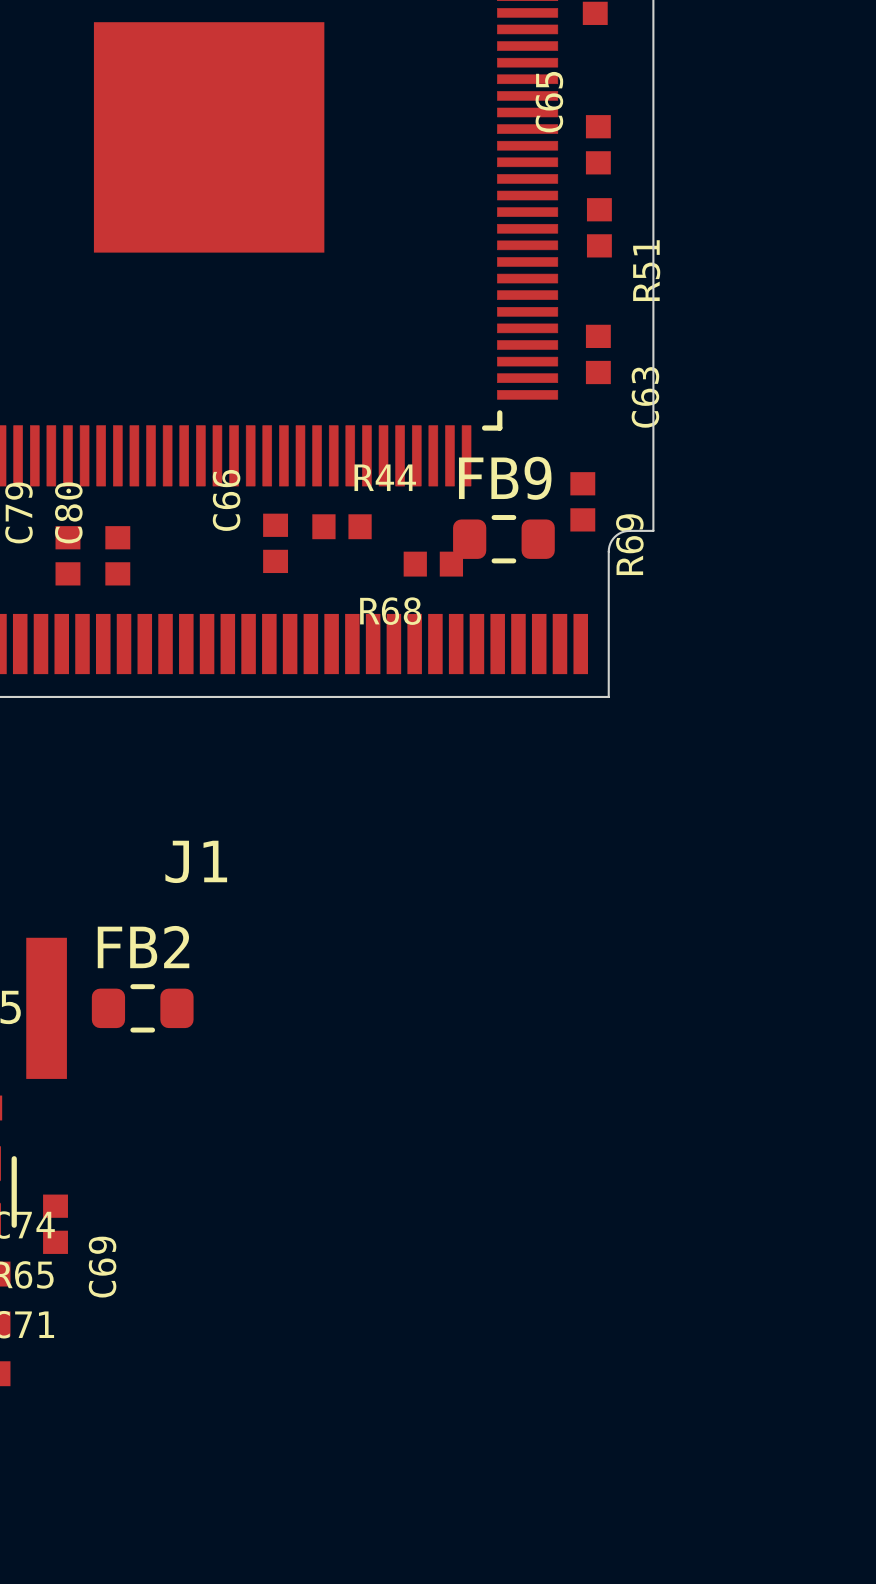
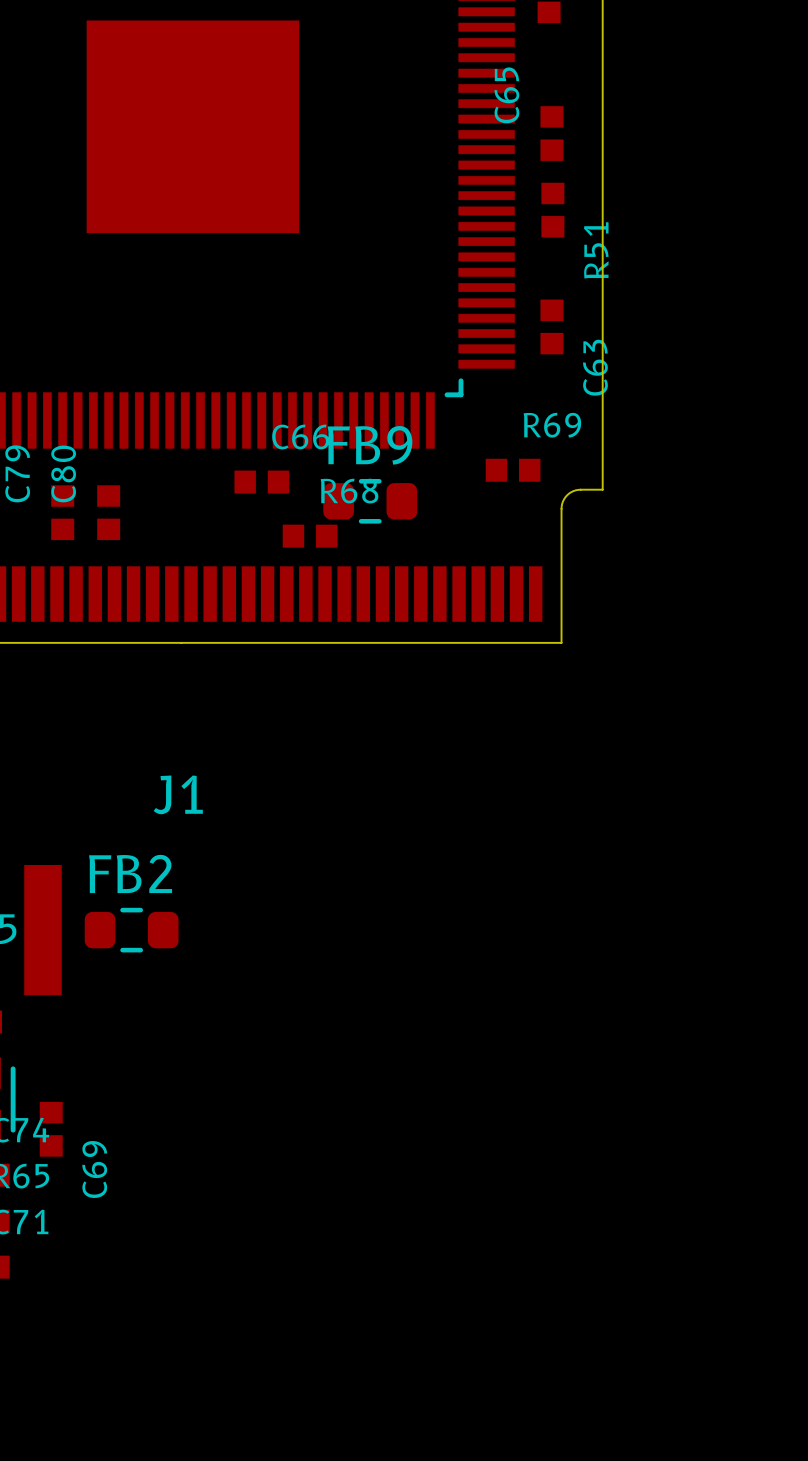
R69 rotation: 0° (582, 501) -> 90° clockwise (513, 470)
R44: (342, 526) -> none
FB9 position: (503, 539) -> (370, 501)
C66 rotation: 0° (275, 543) -> 90° clockwise (261, 482)
R69 name position: R69 (629, 544) -> R69 (552, 425)
R68 position: (433, 564) -> (310, 536)
R68 name position: R68 (390, 611) -> R68 (349, 491)

